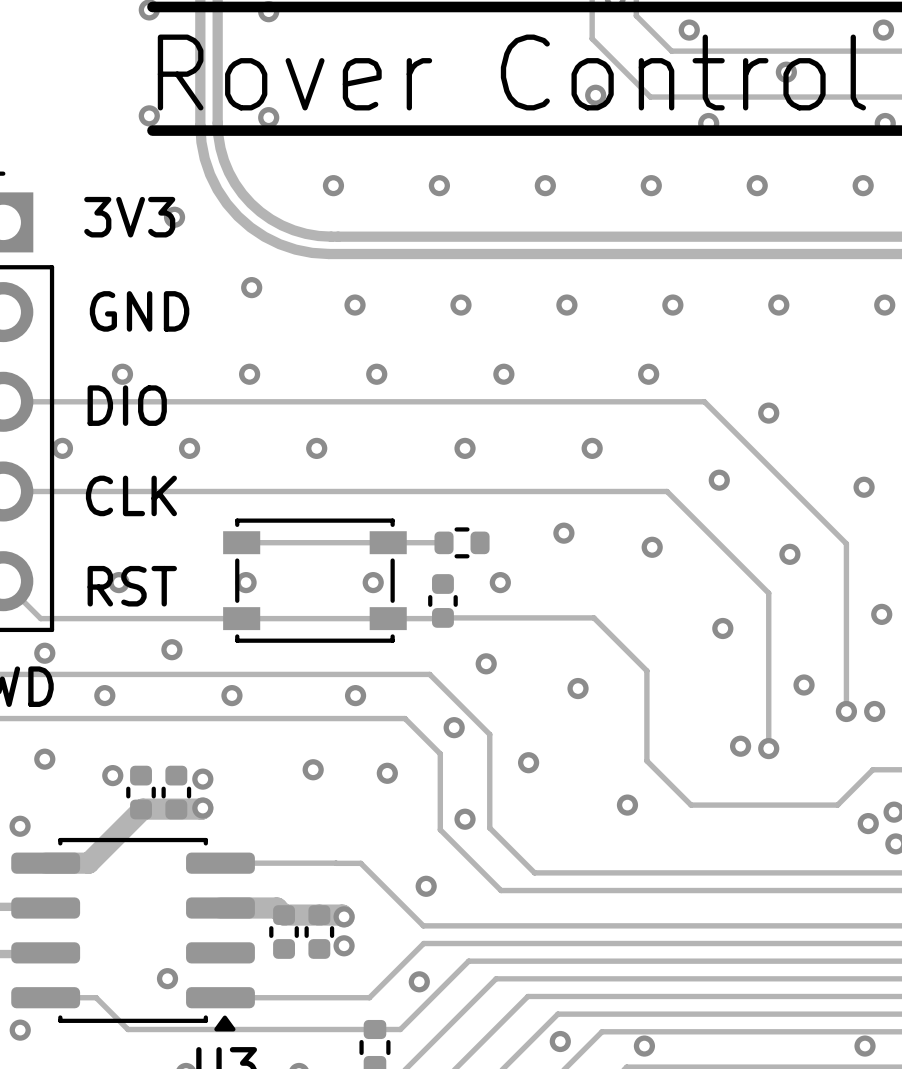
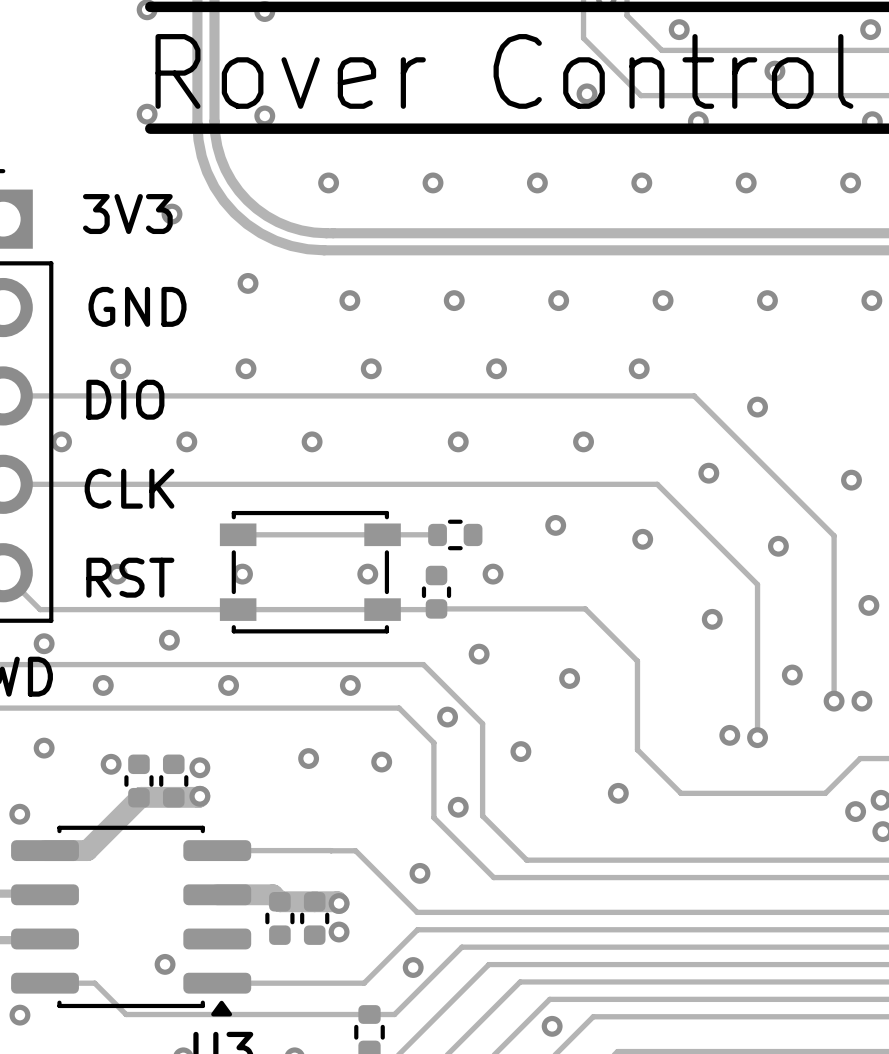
via: (644, 1046) -> none
via: (865, 1046) -> none

